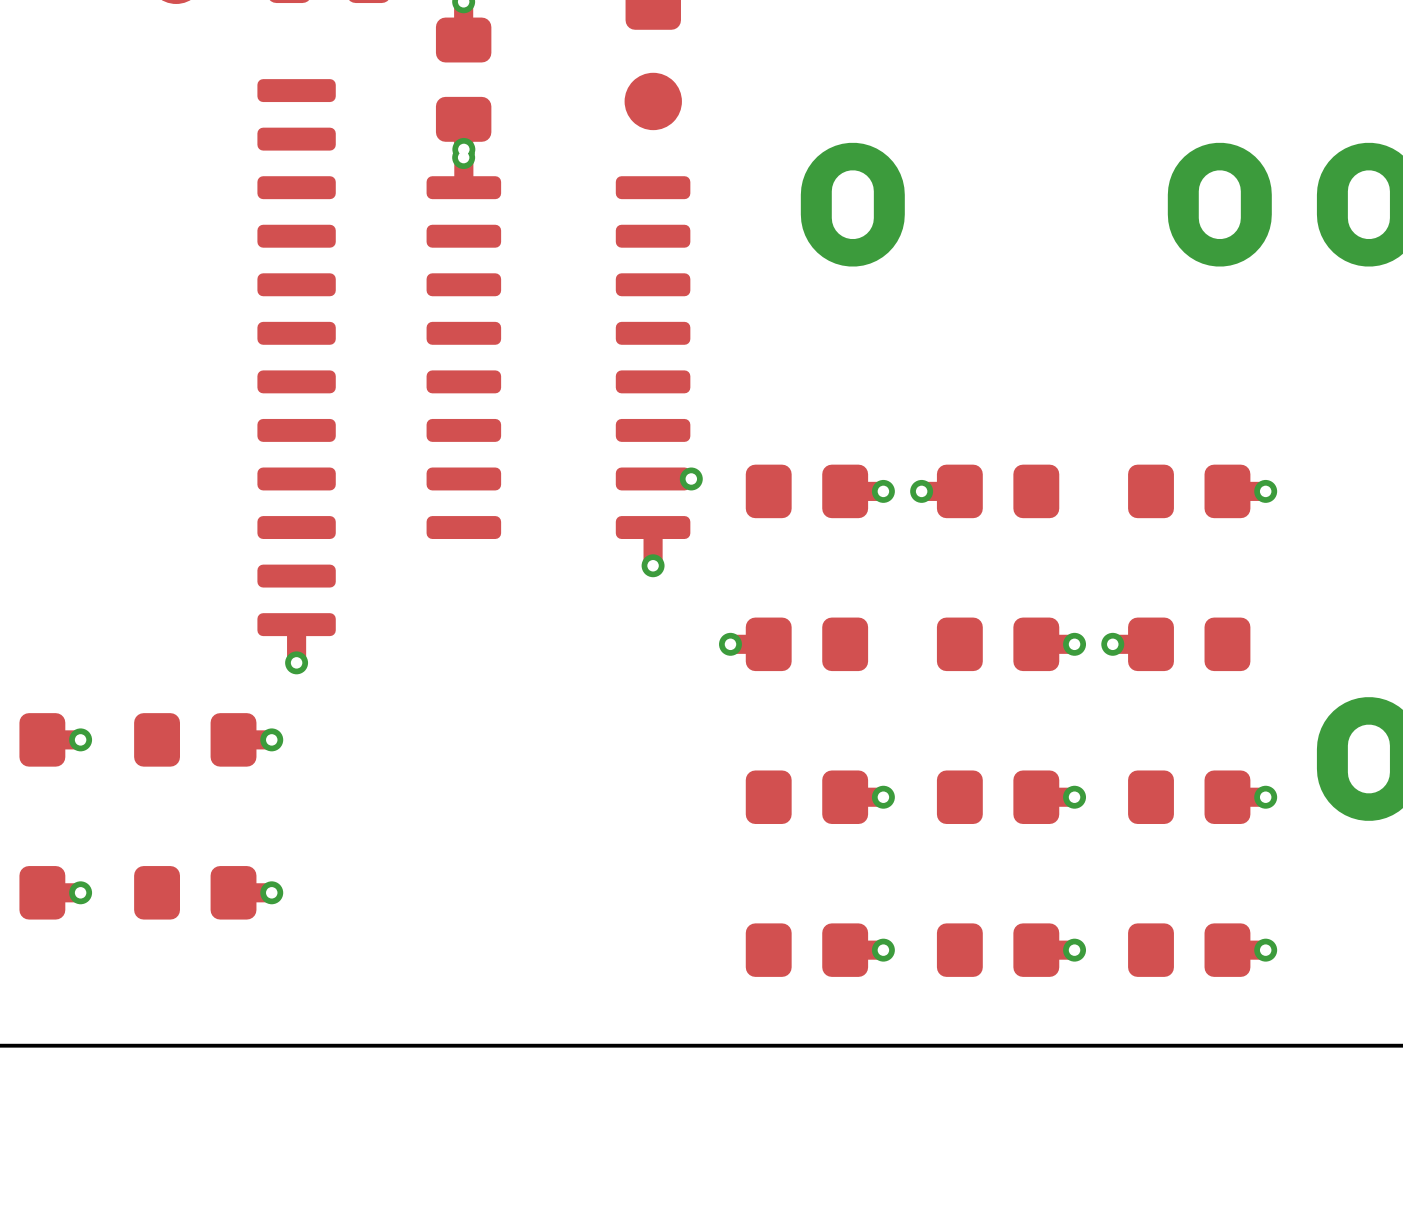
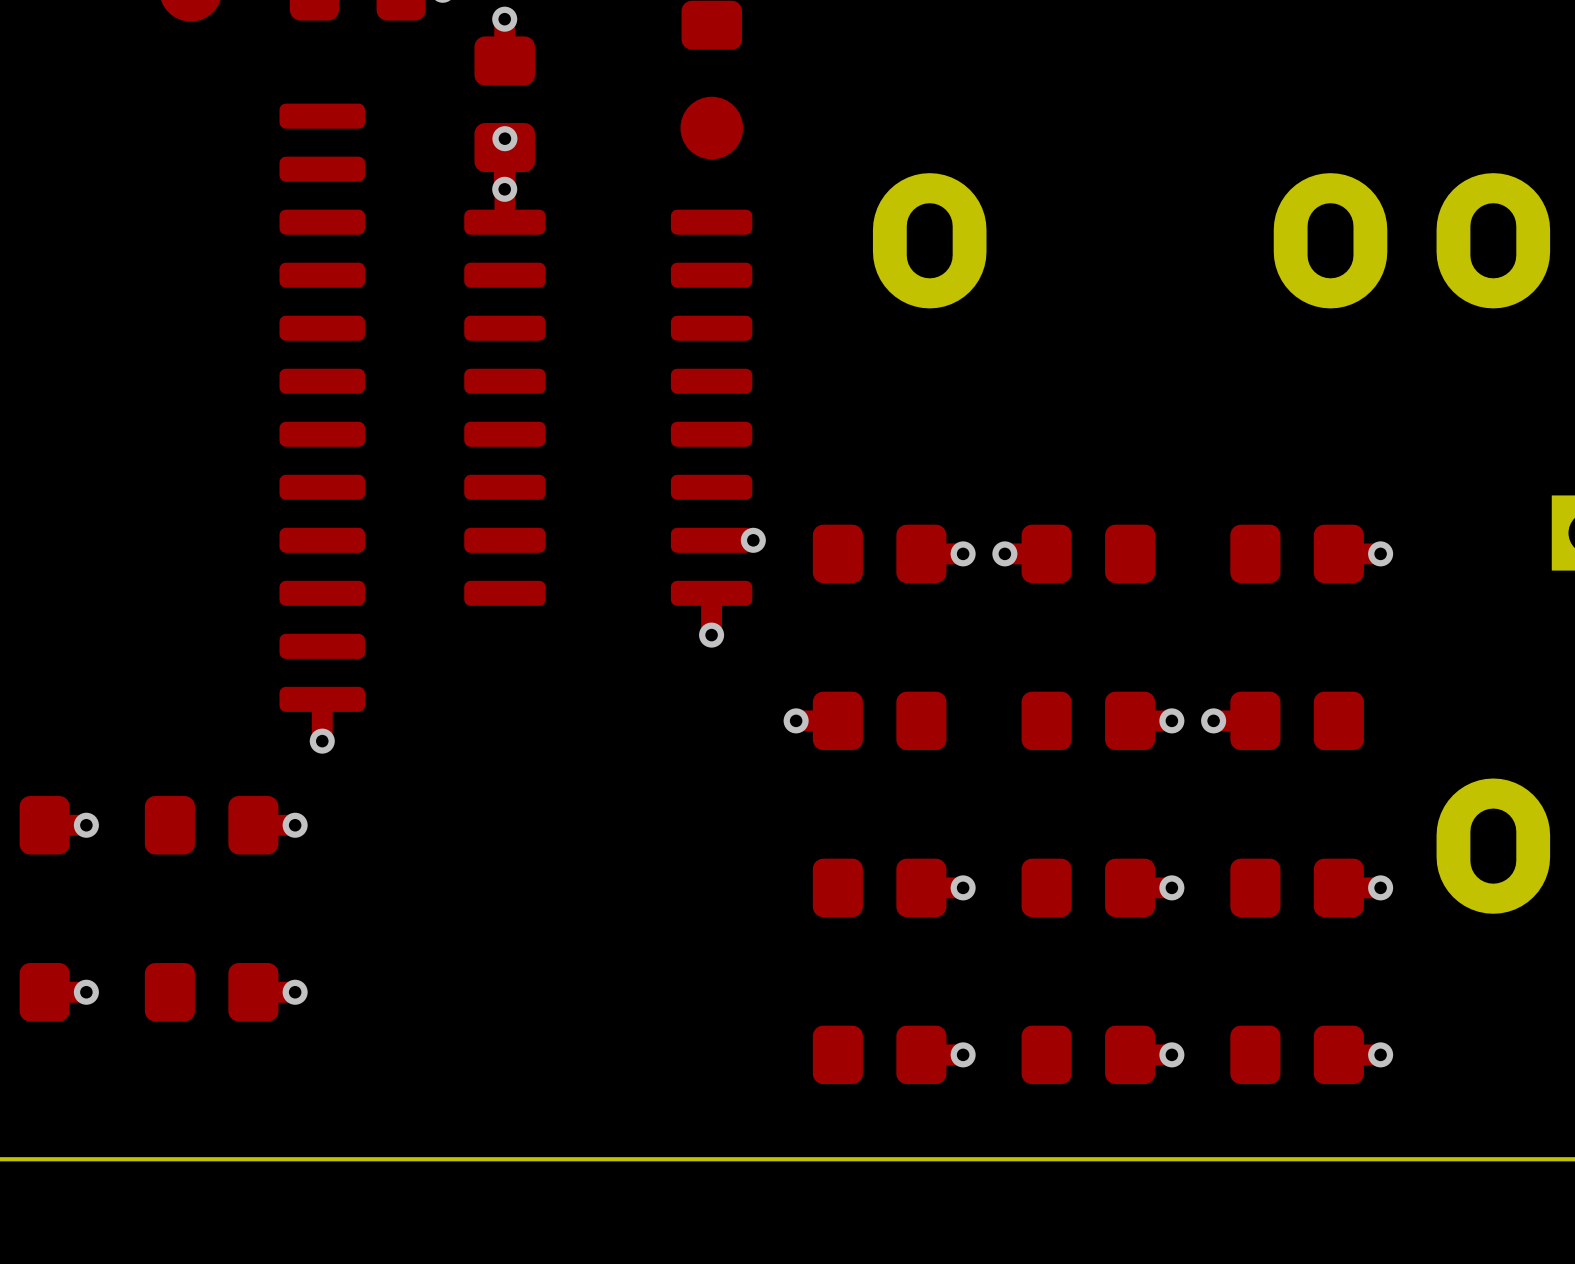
via position: (463, 149) -> (504, 138)

